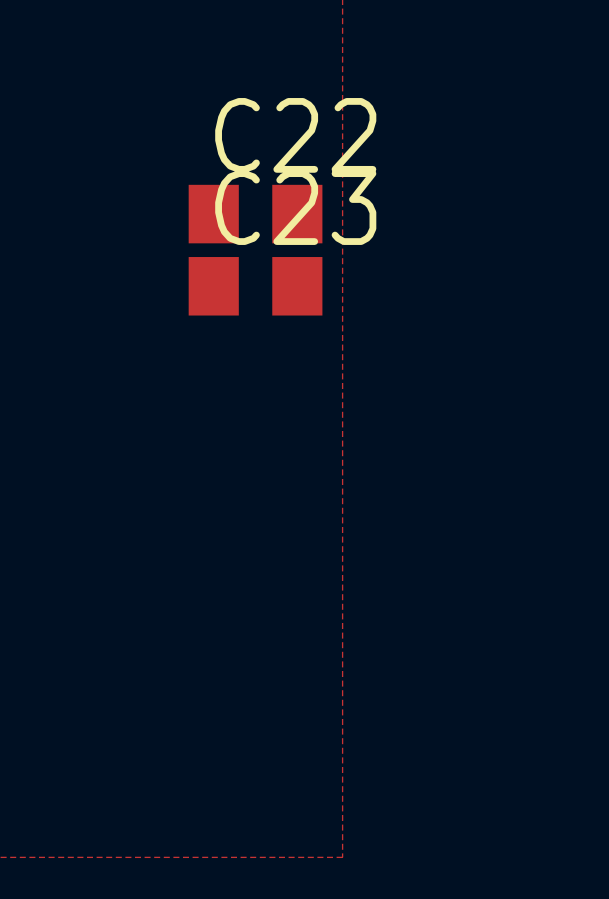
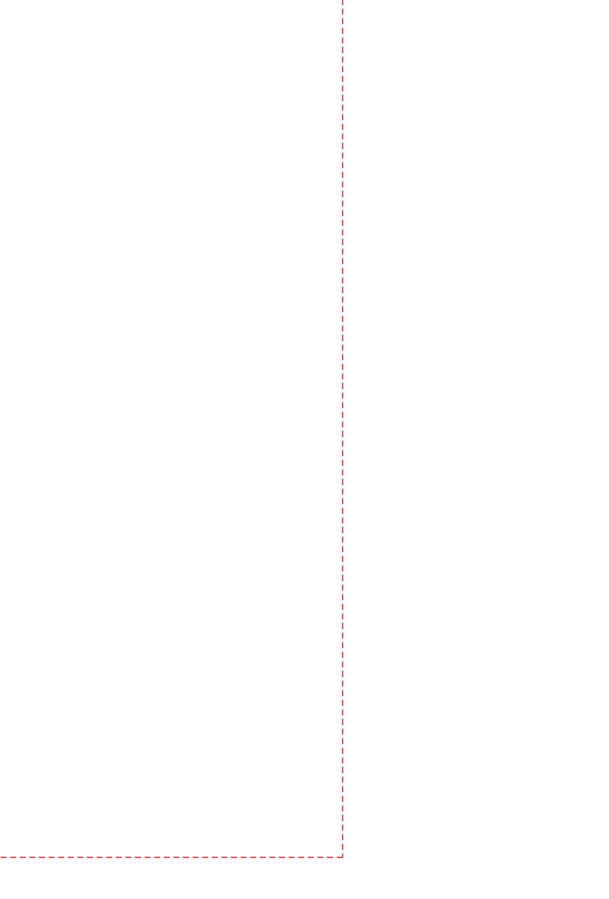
C22: (255, 214) -> none
C23: (255, 286) -> none

